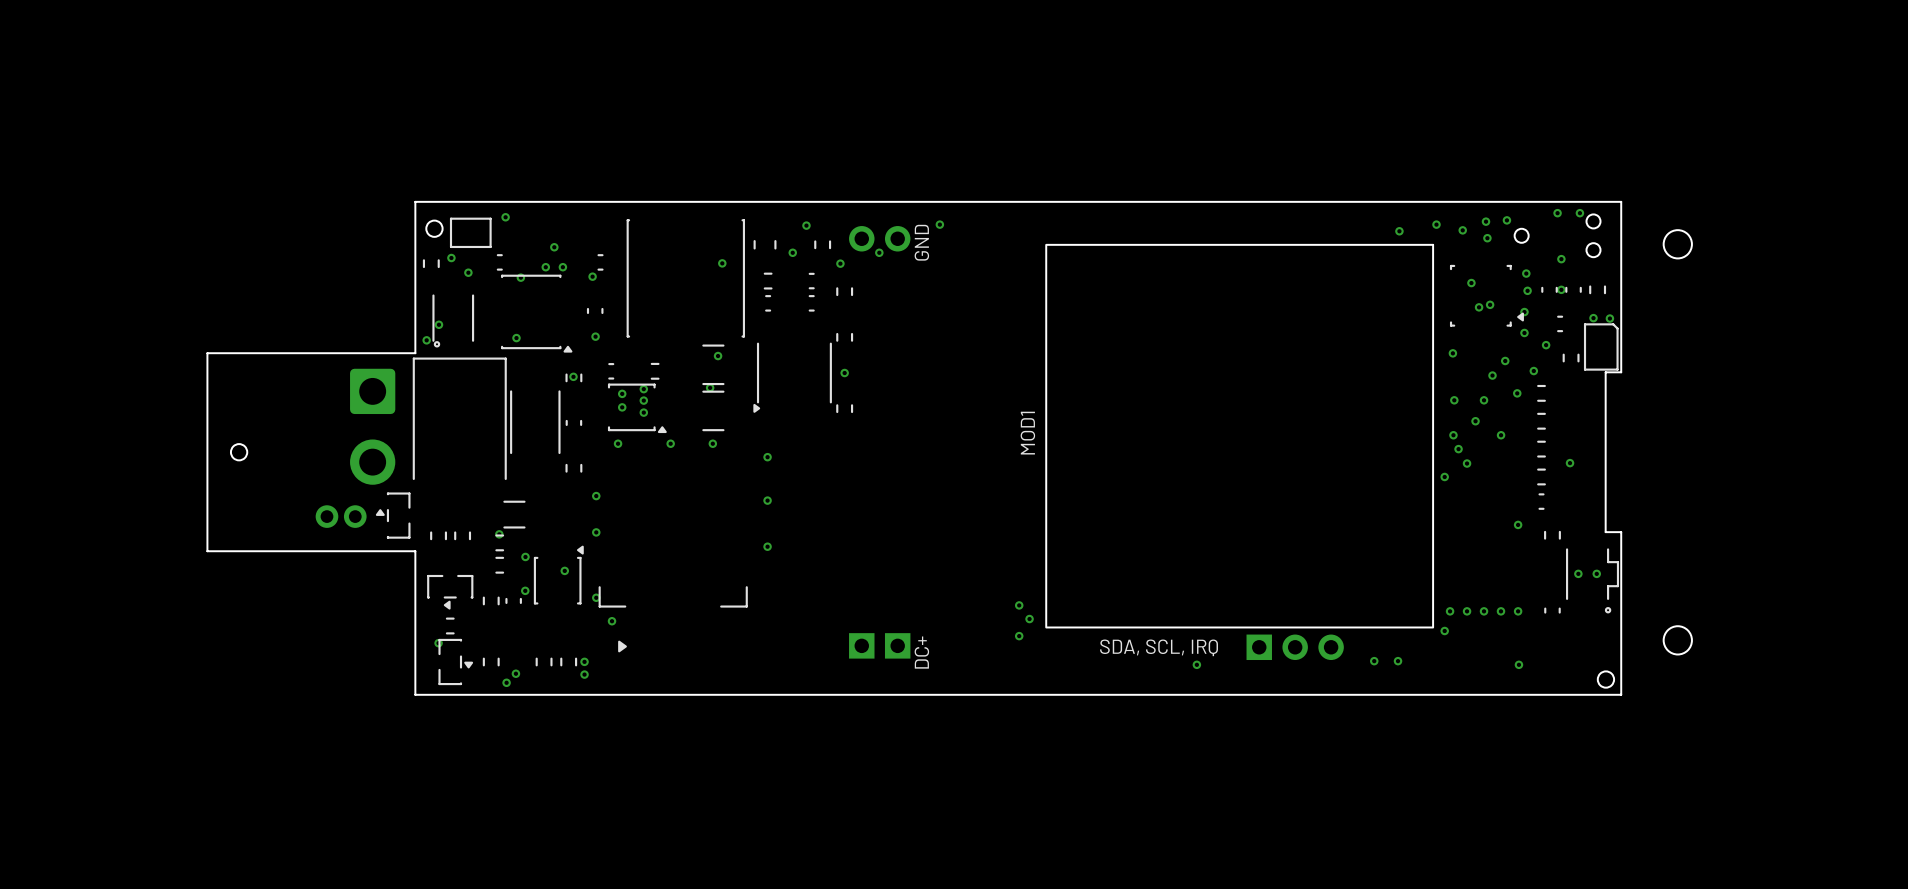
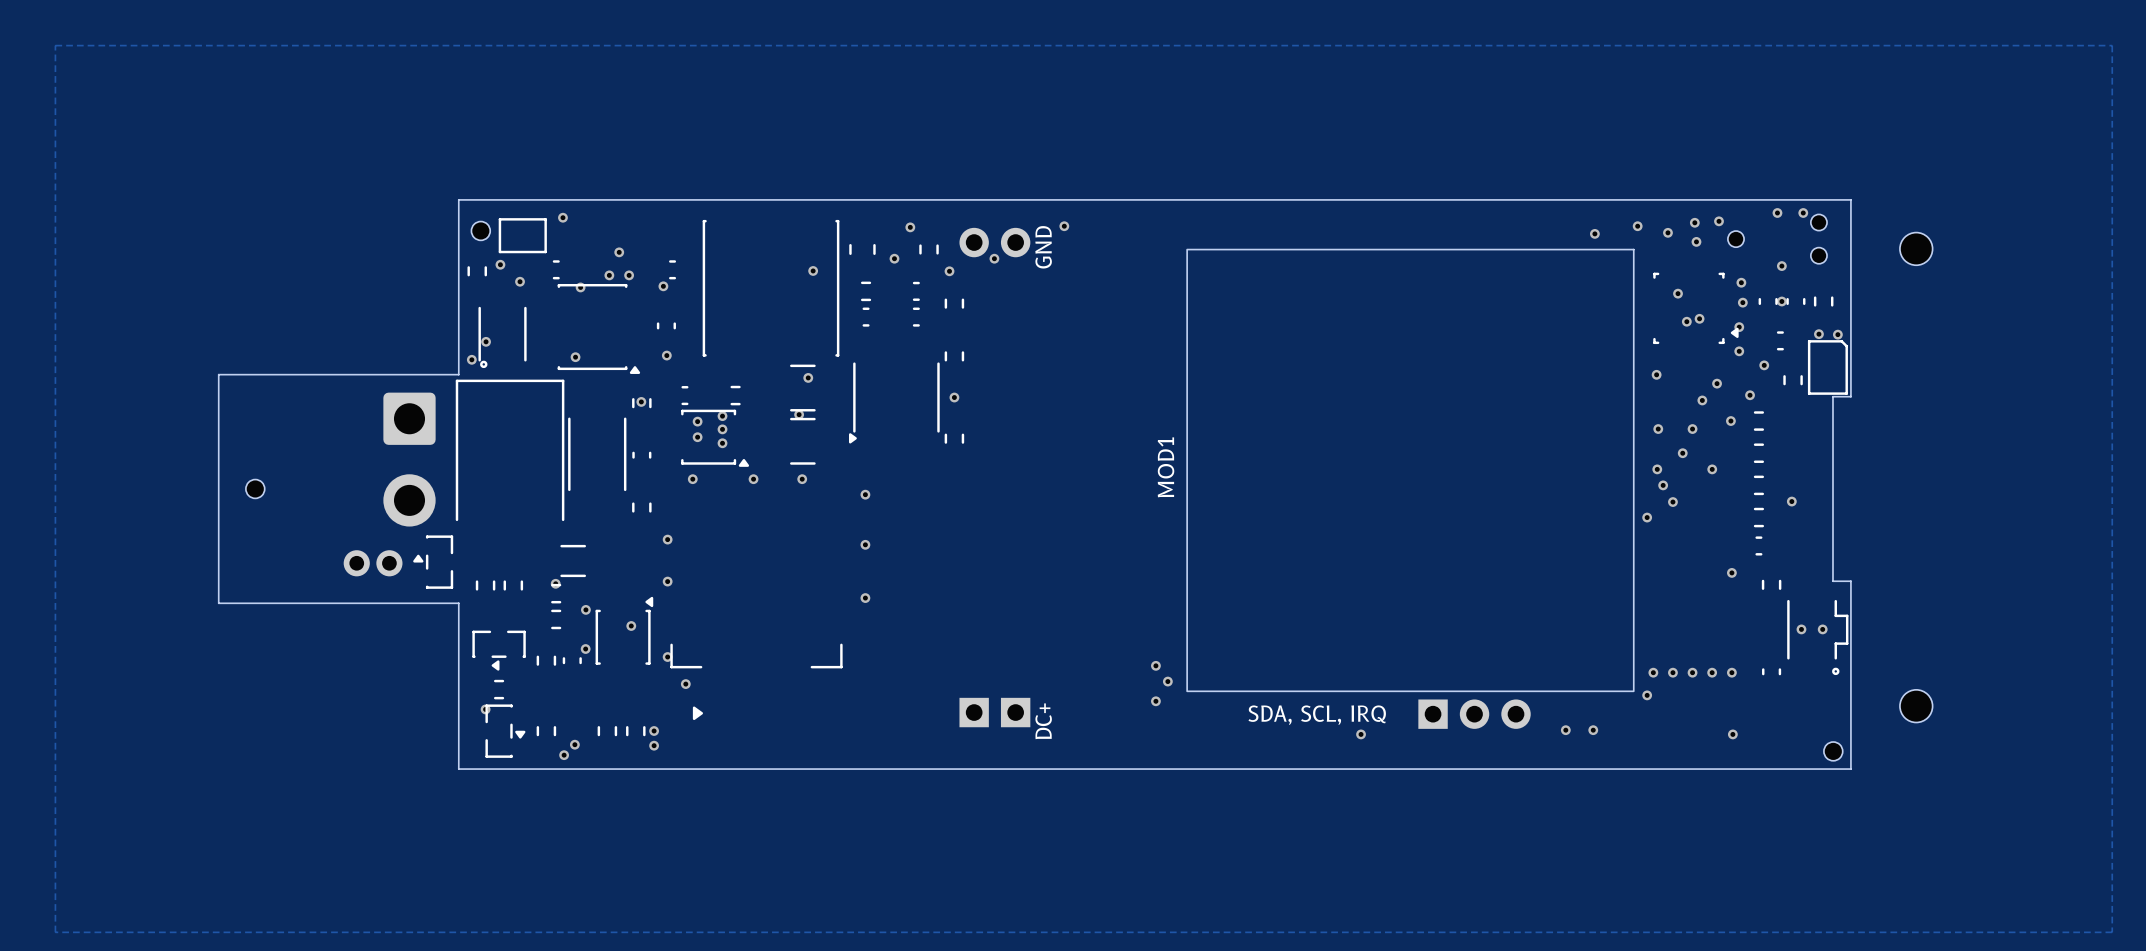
zone outline: none -> (55, 45) (2112, 45) (2112, 932) (55, 932) (55, 45)

